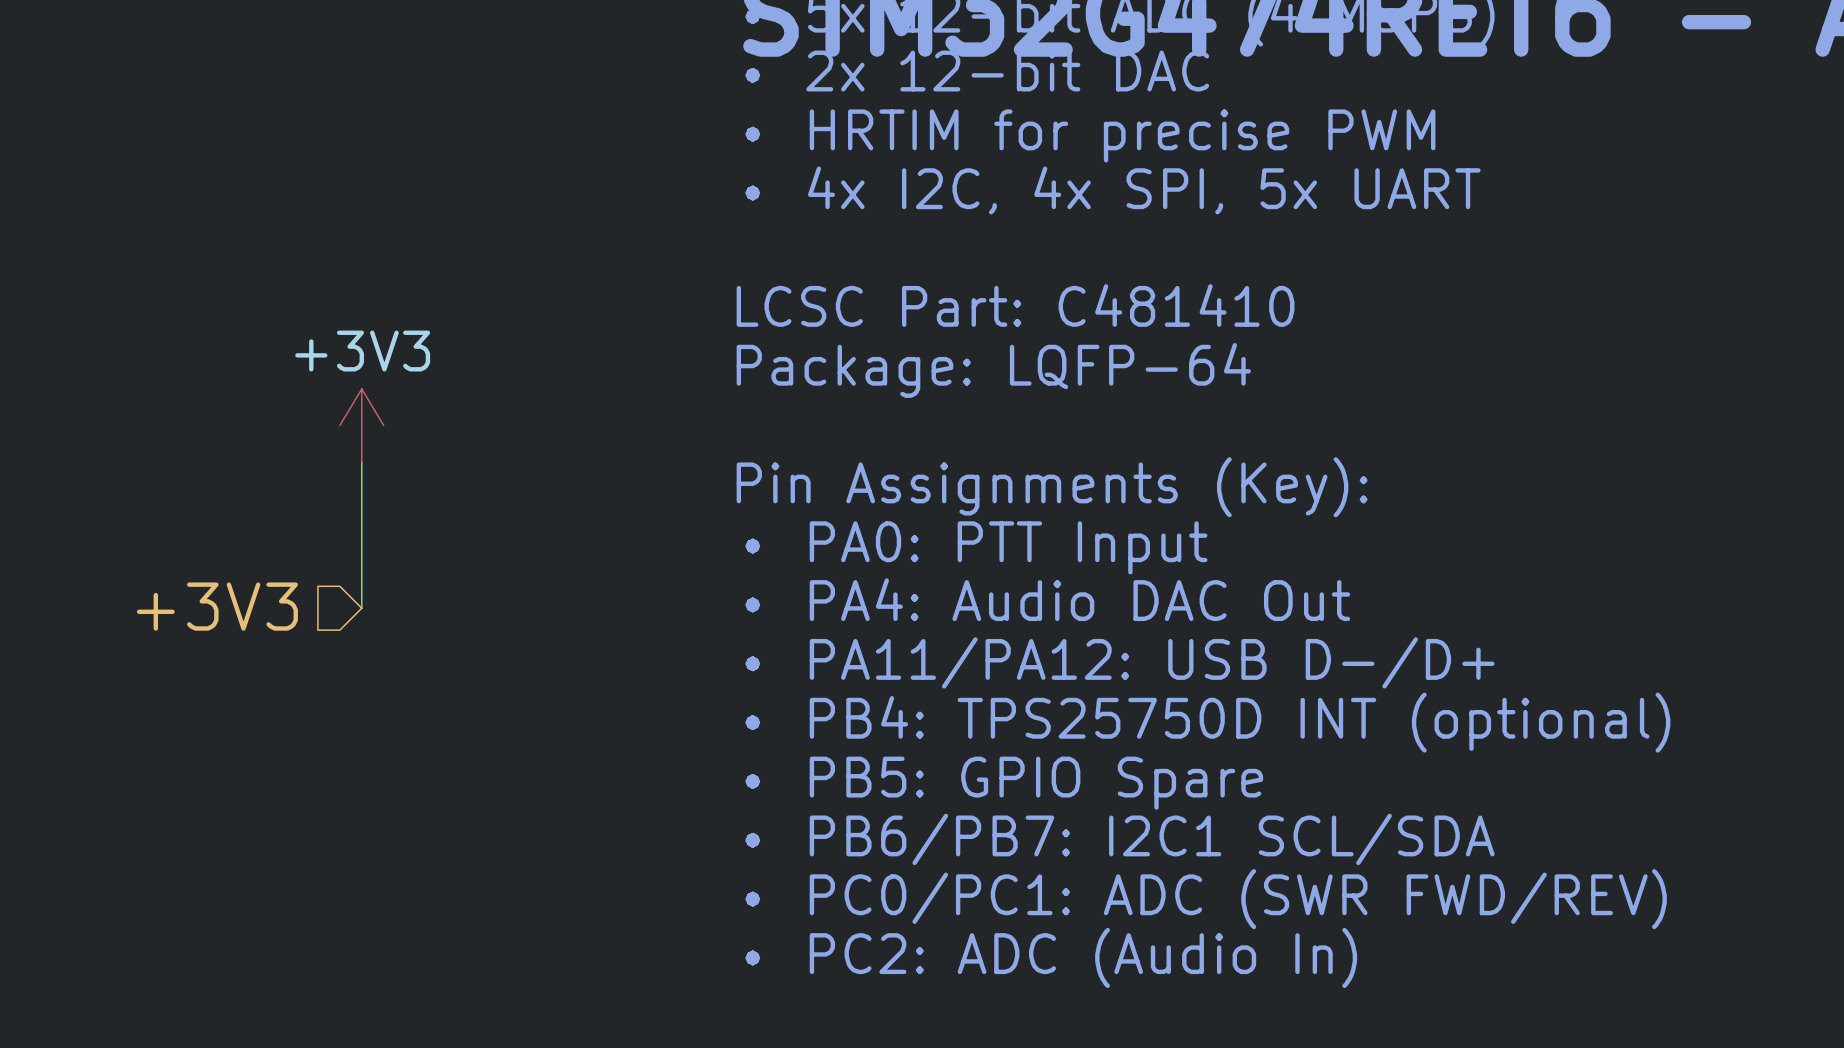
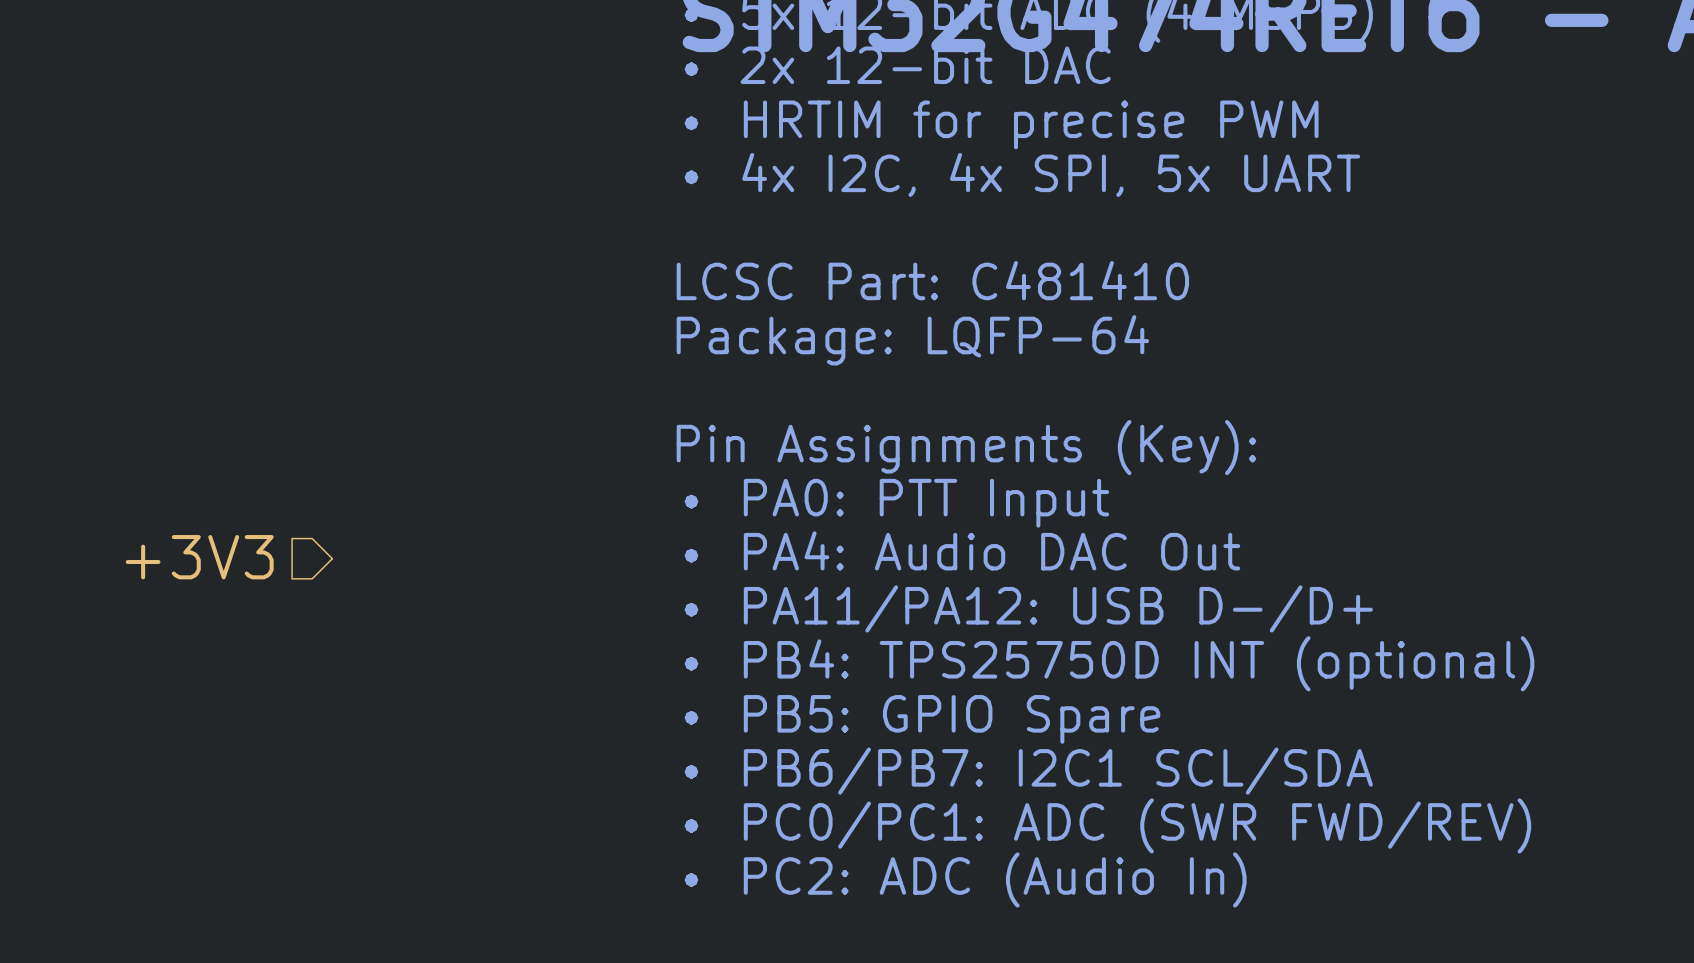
power symbol: +3V3 (361, 425) -> none
wire: (361, 462) (361, 608) -> none

